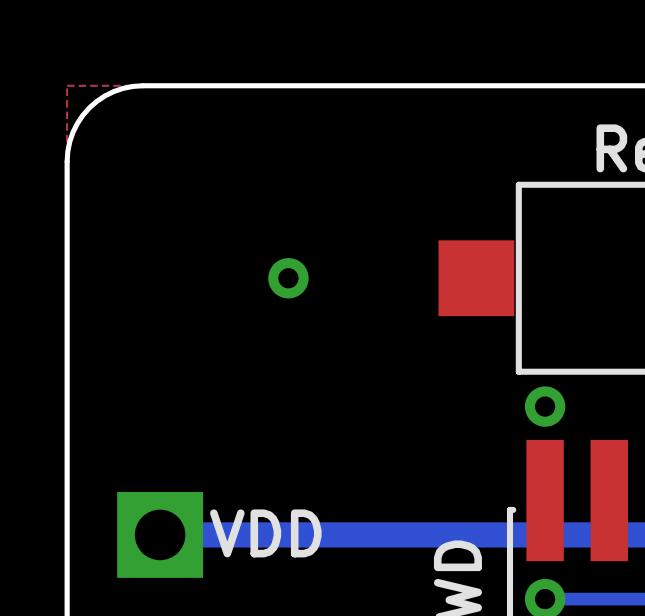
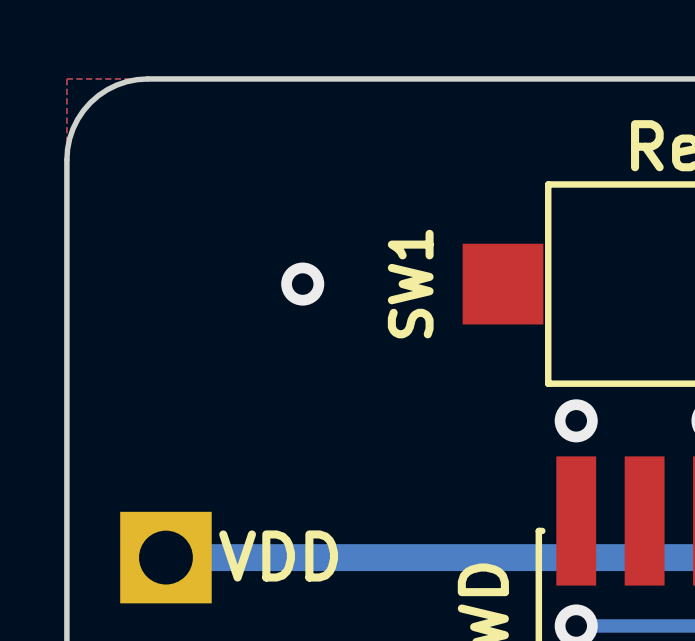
SW1 name: none -> SW1 (410, 284)

